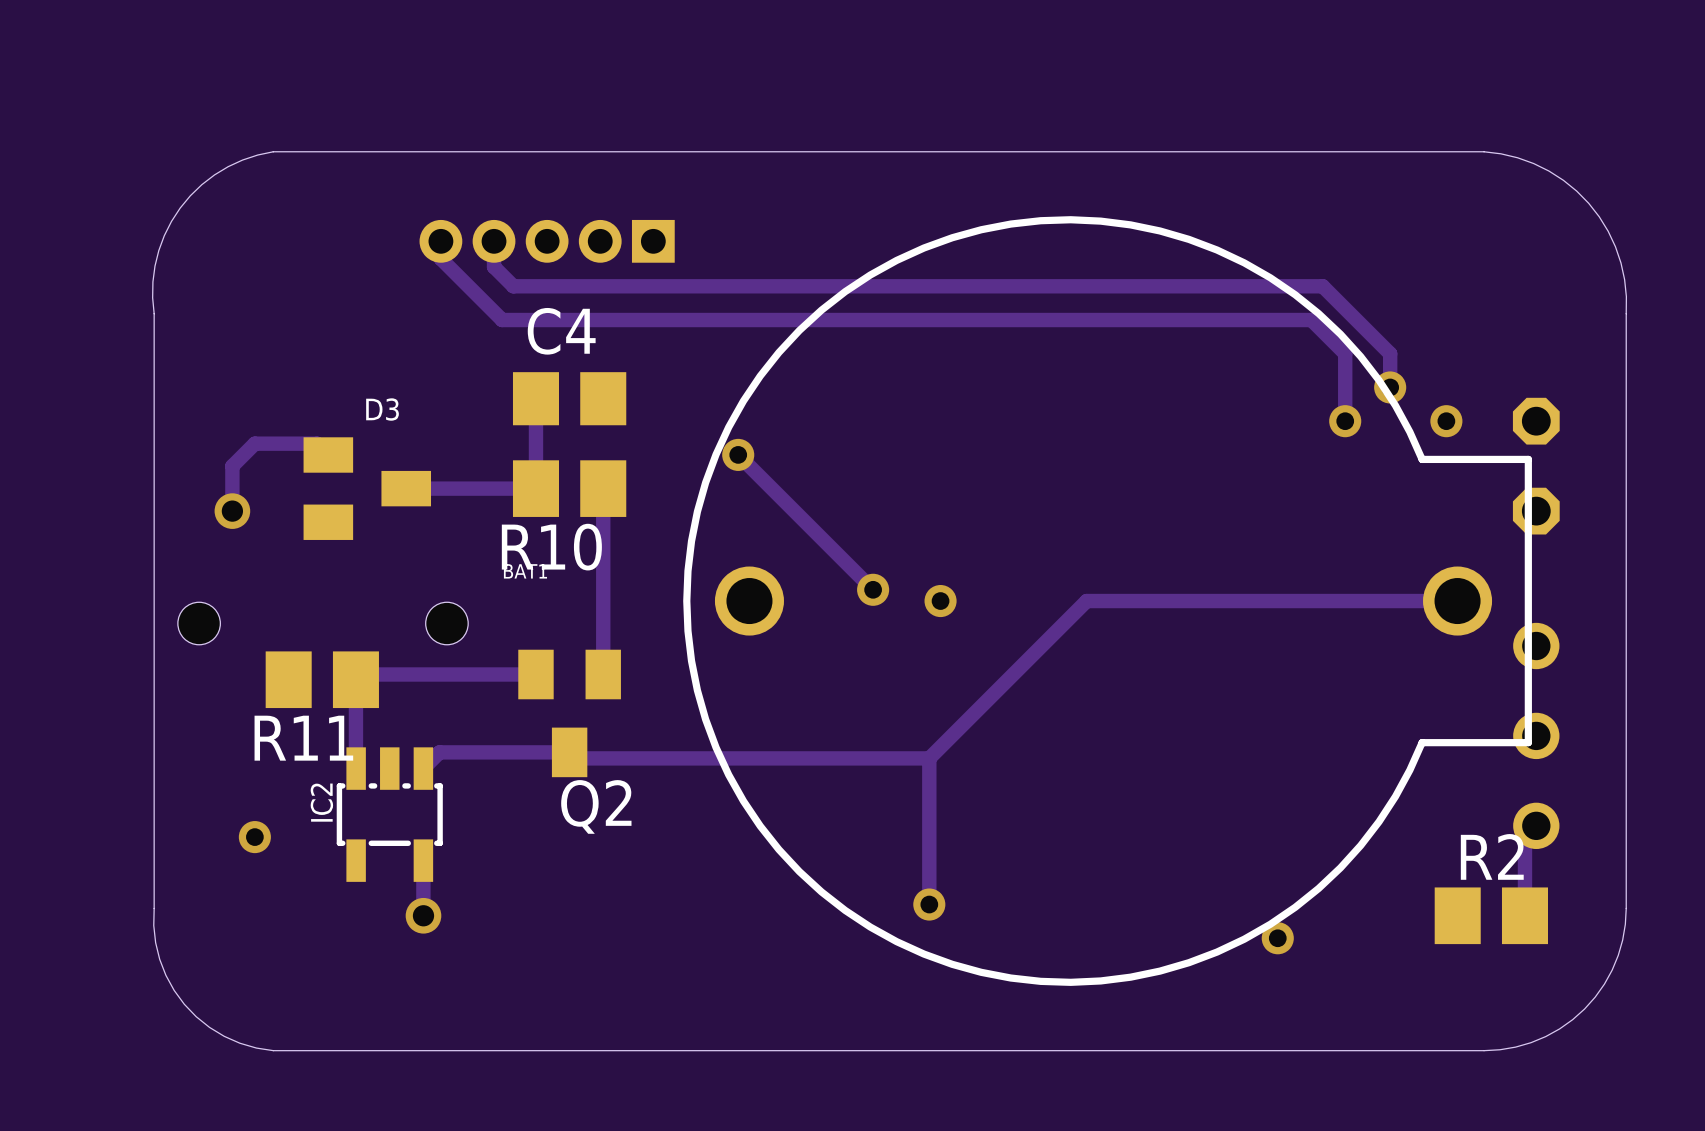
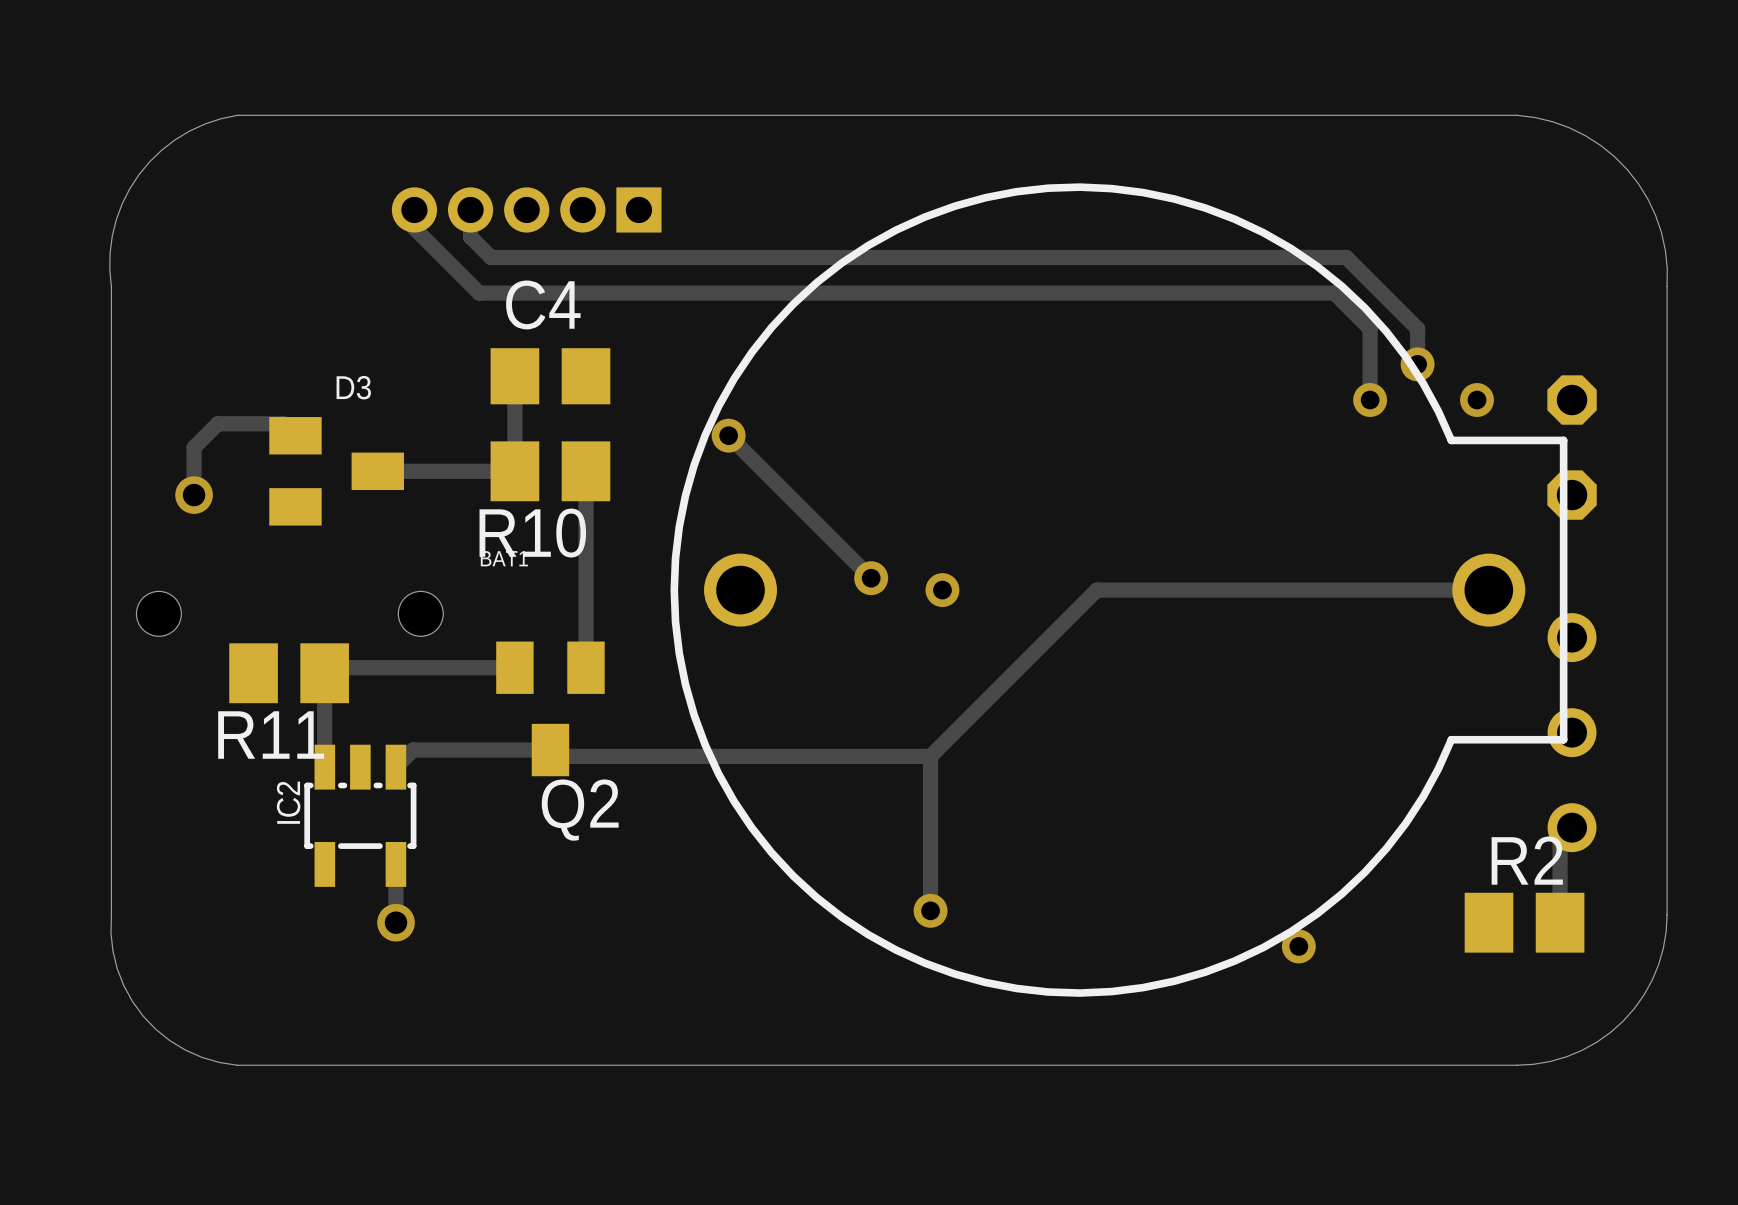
via: (254, 837) -> none

